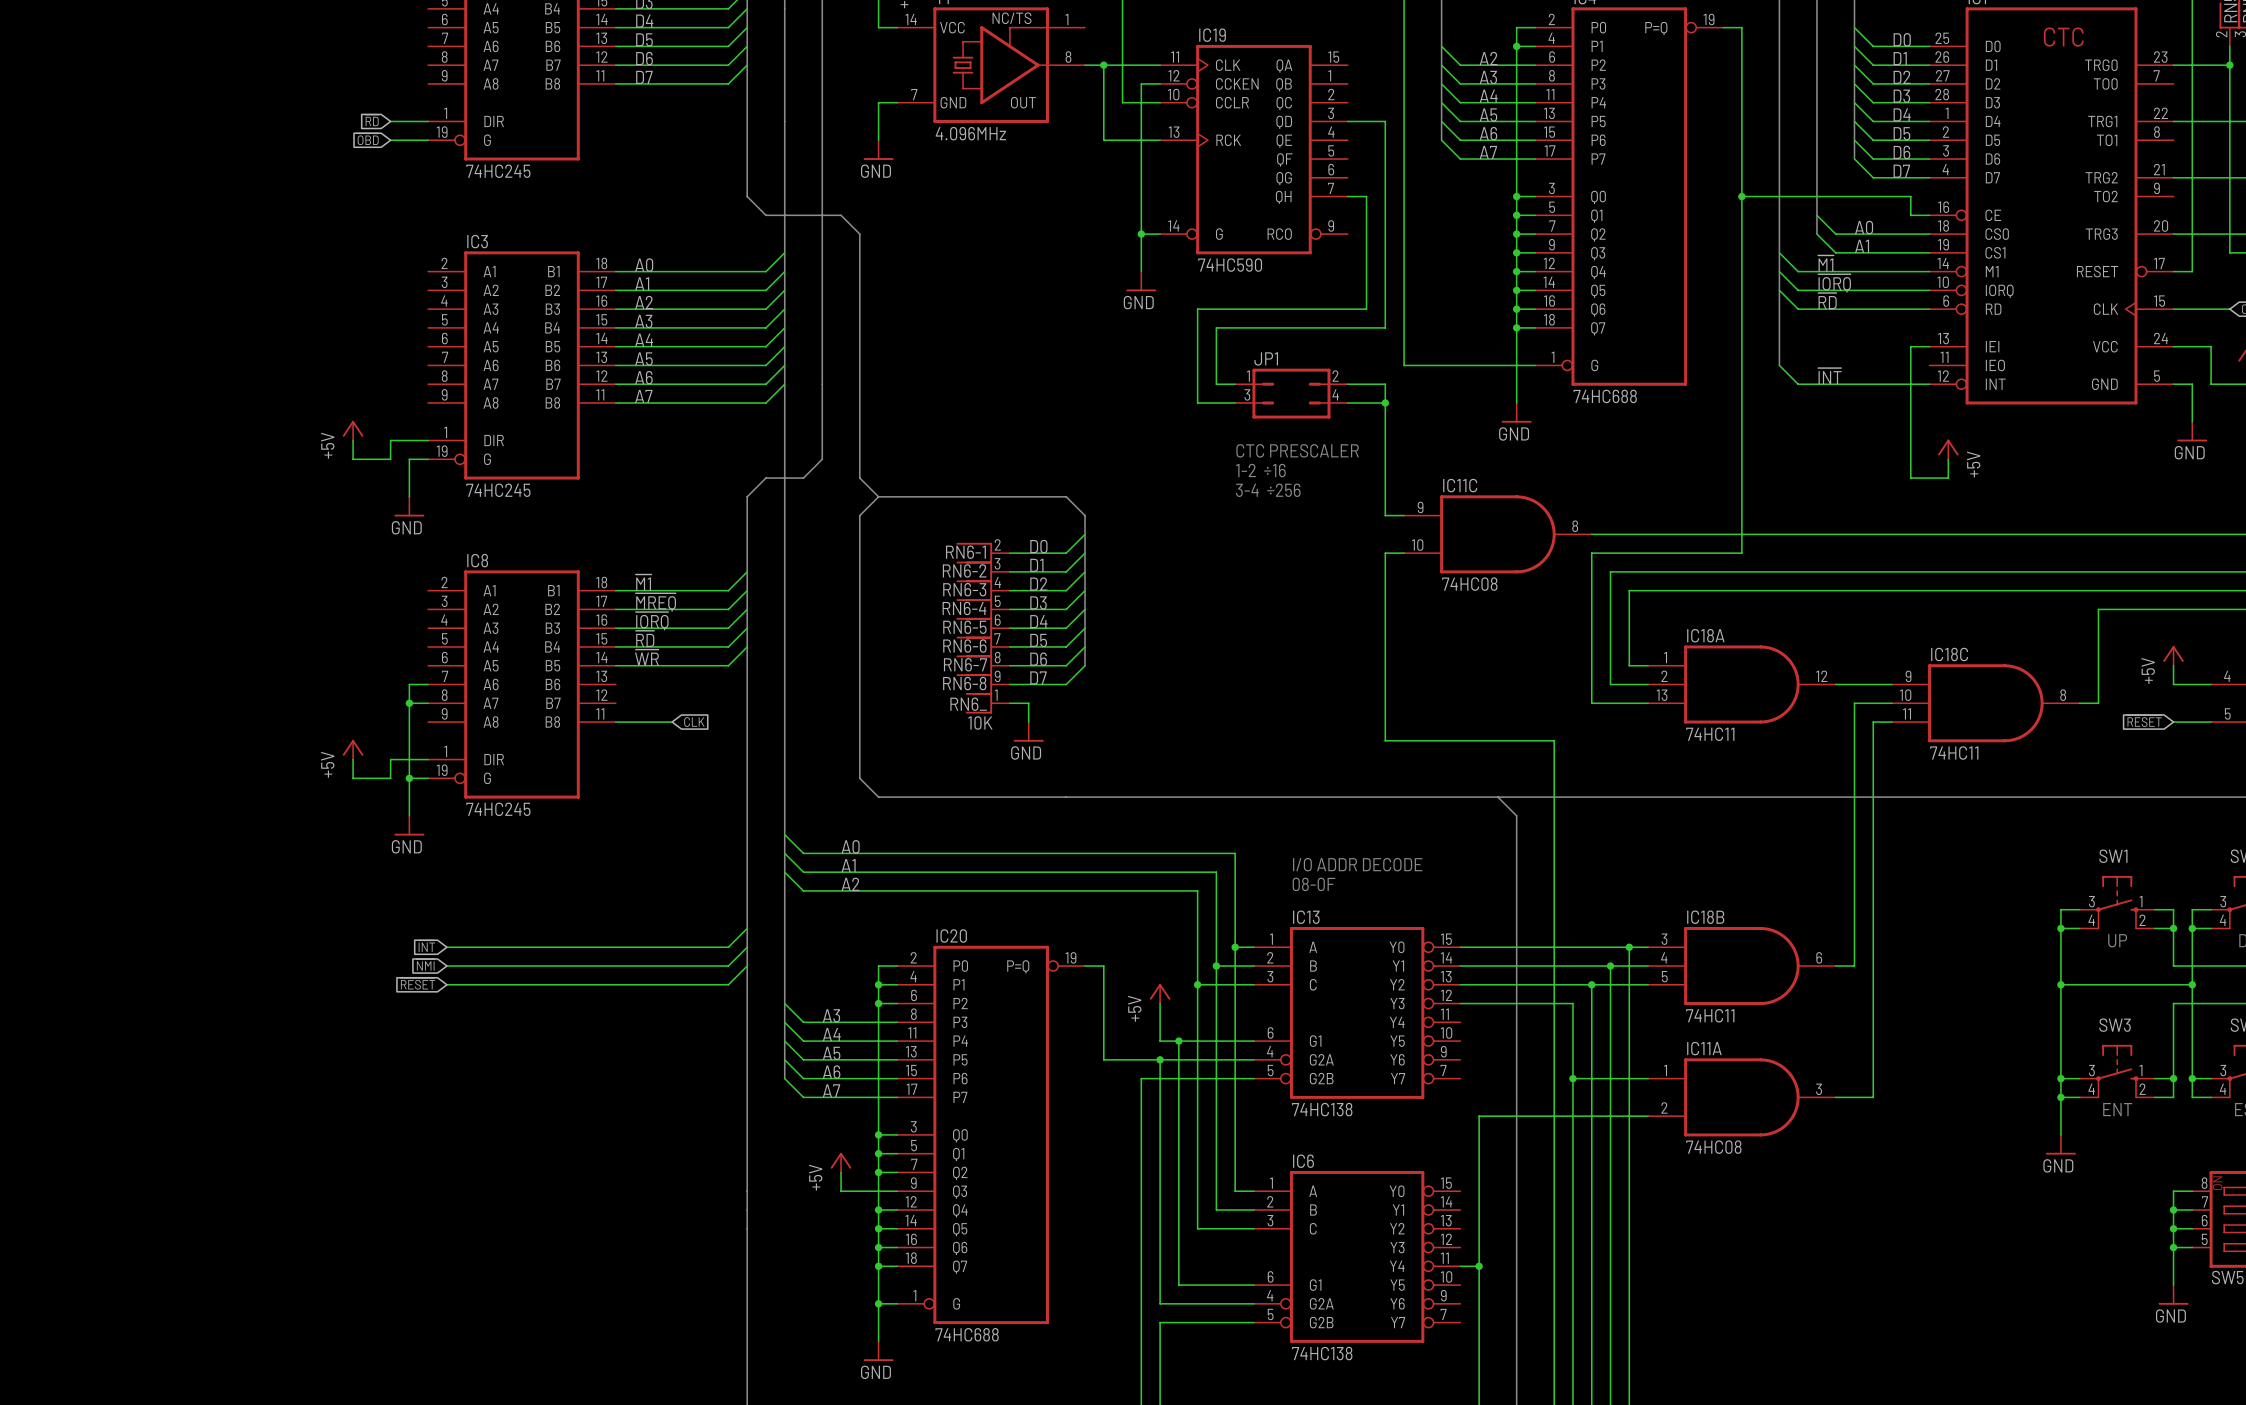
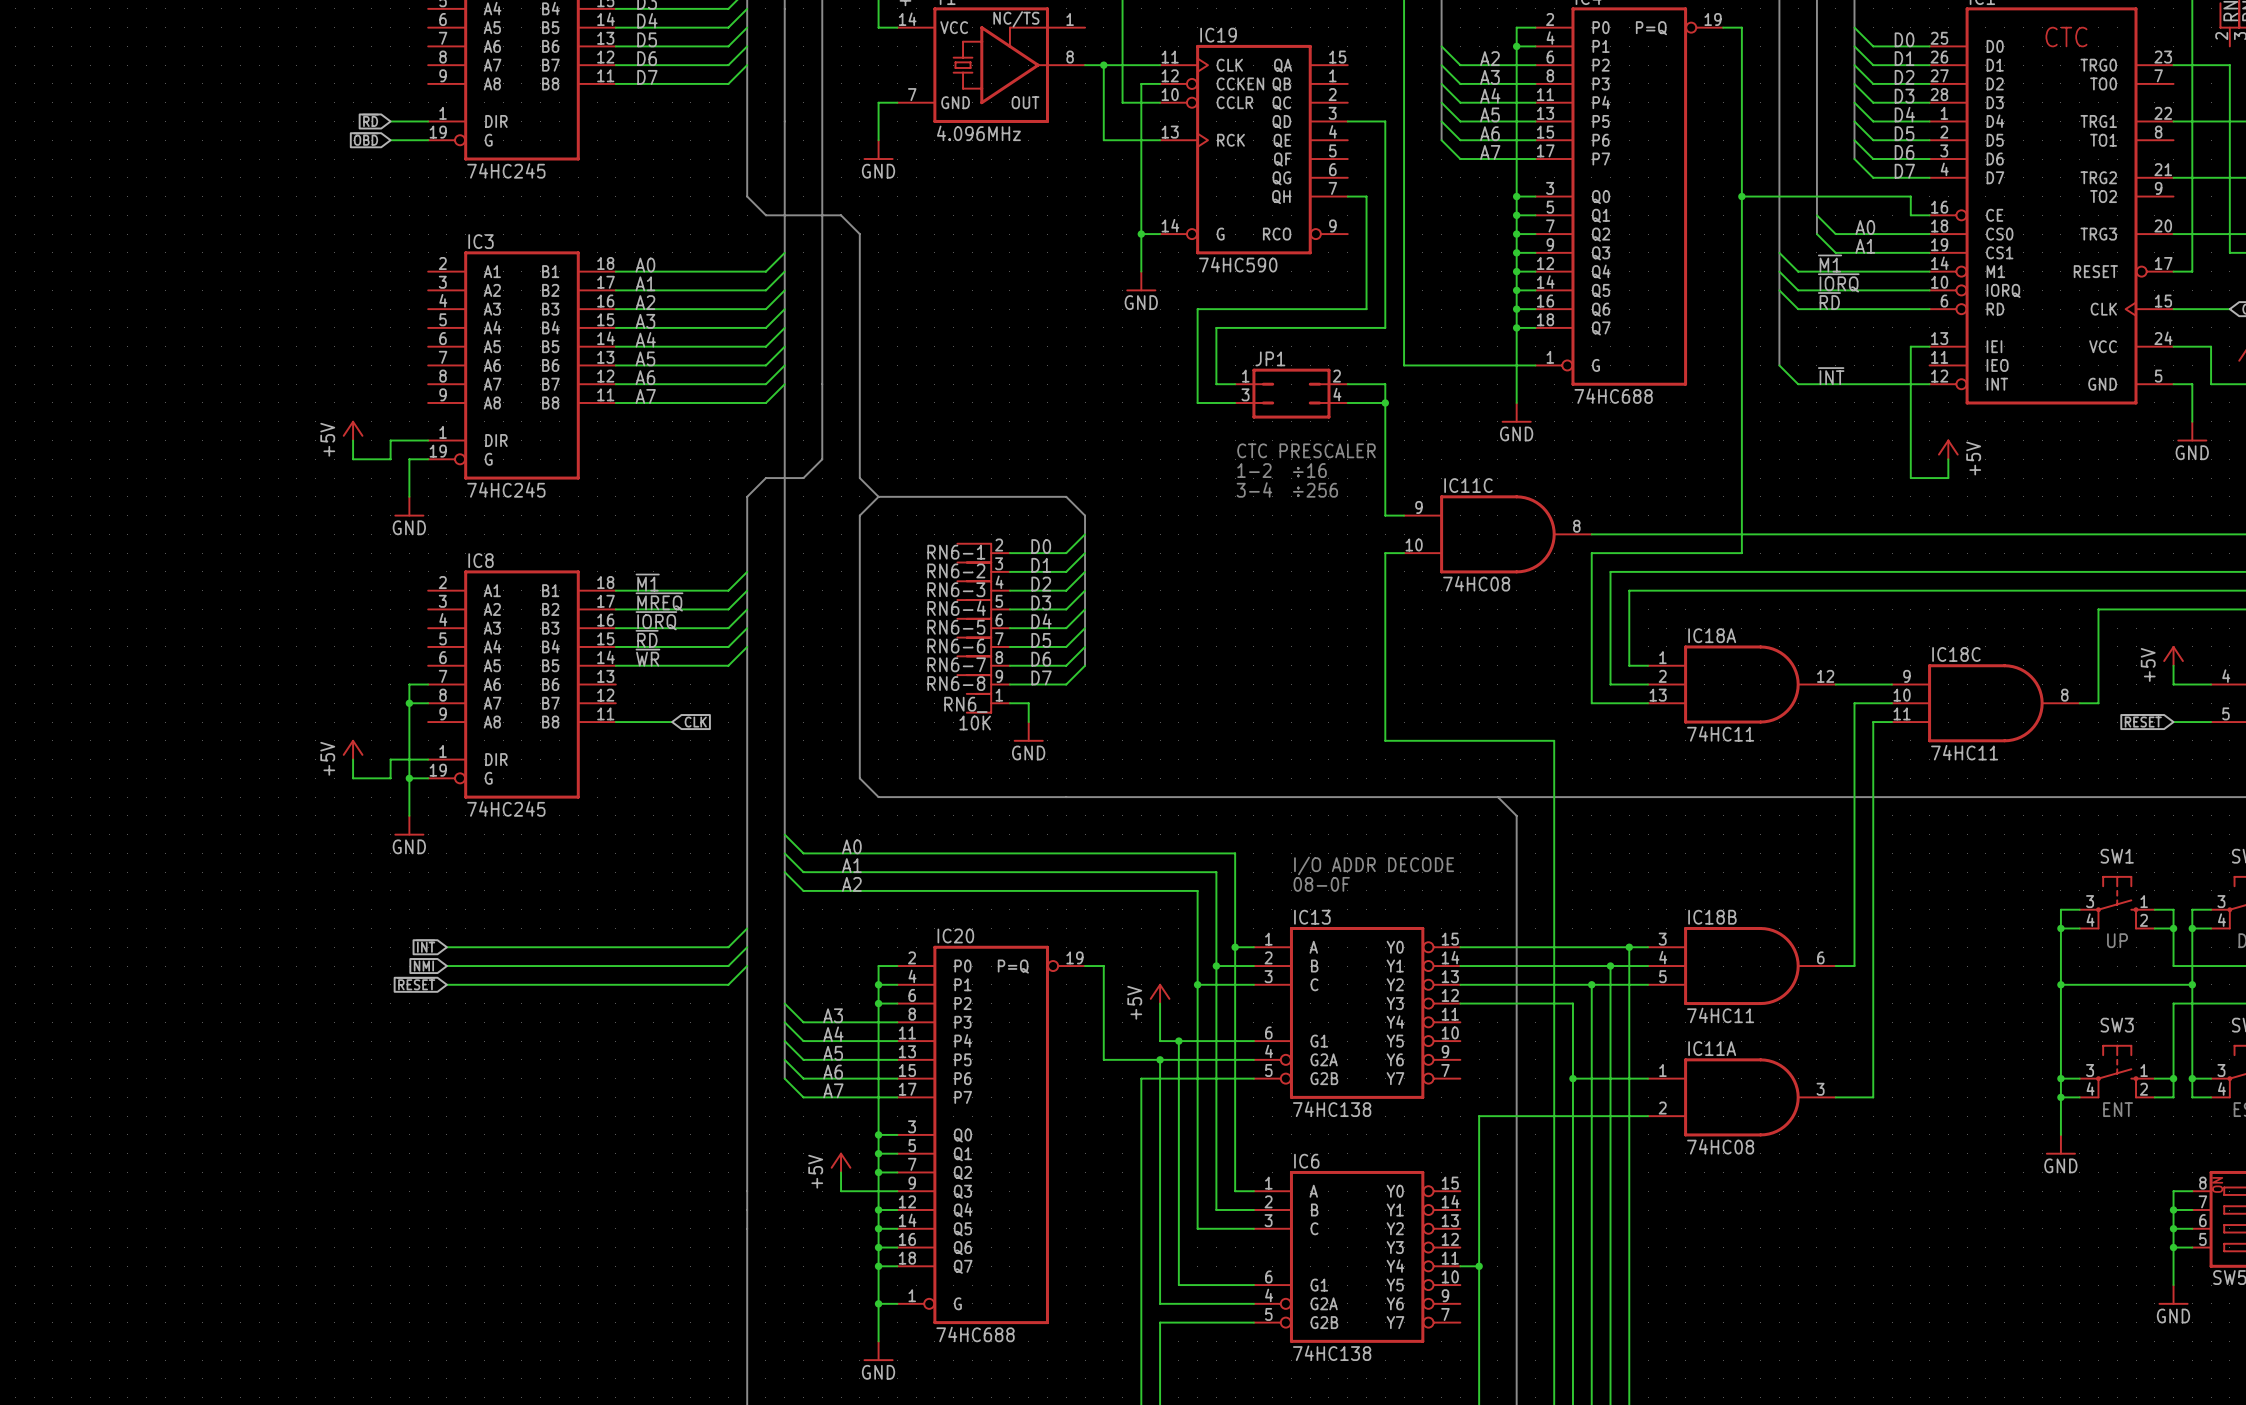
wire: (2229, 46) (2229, 65) -> none
junction: (2229, 65) -> none

